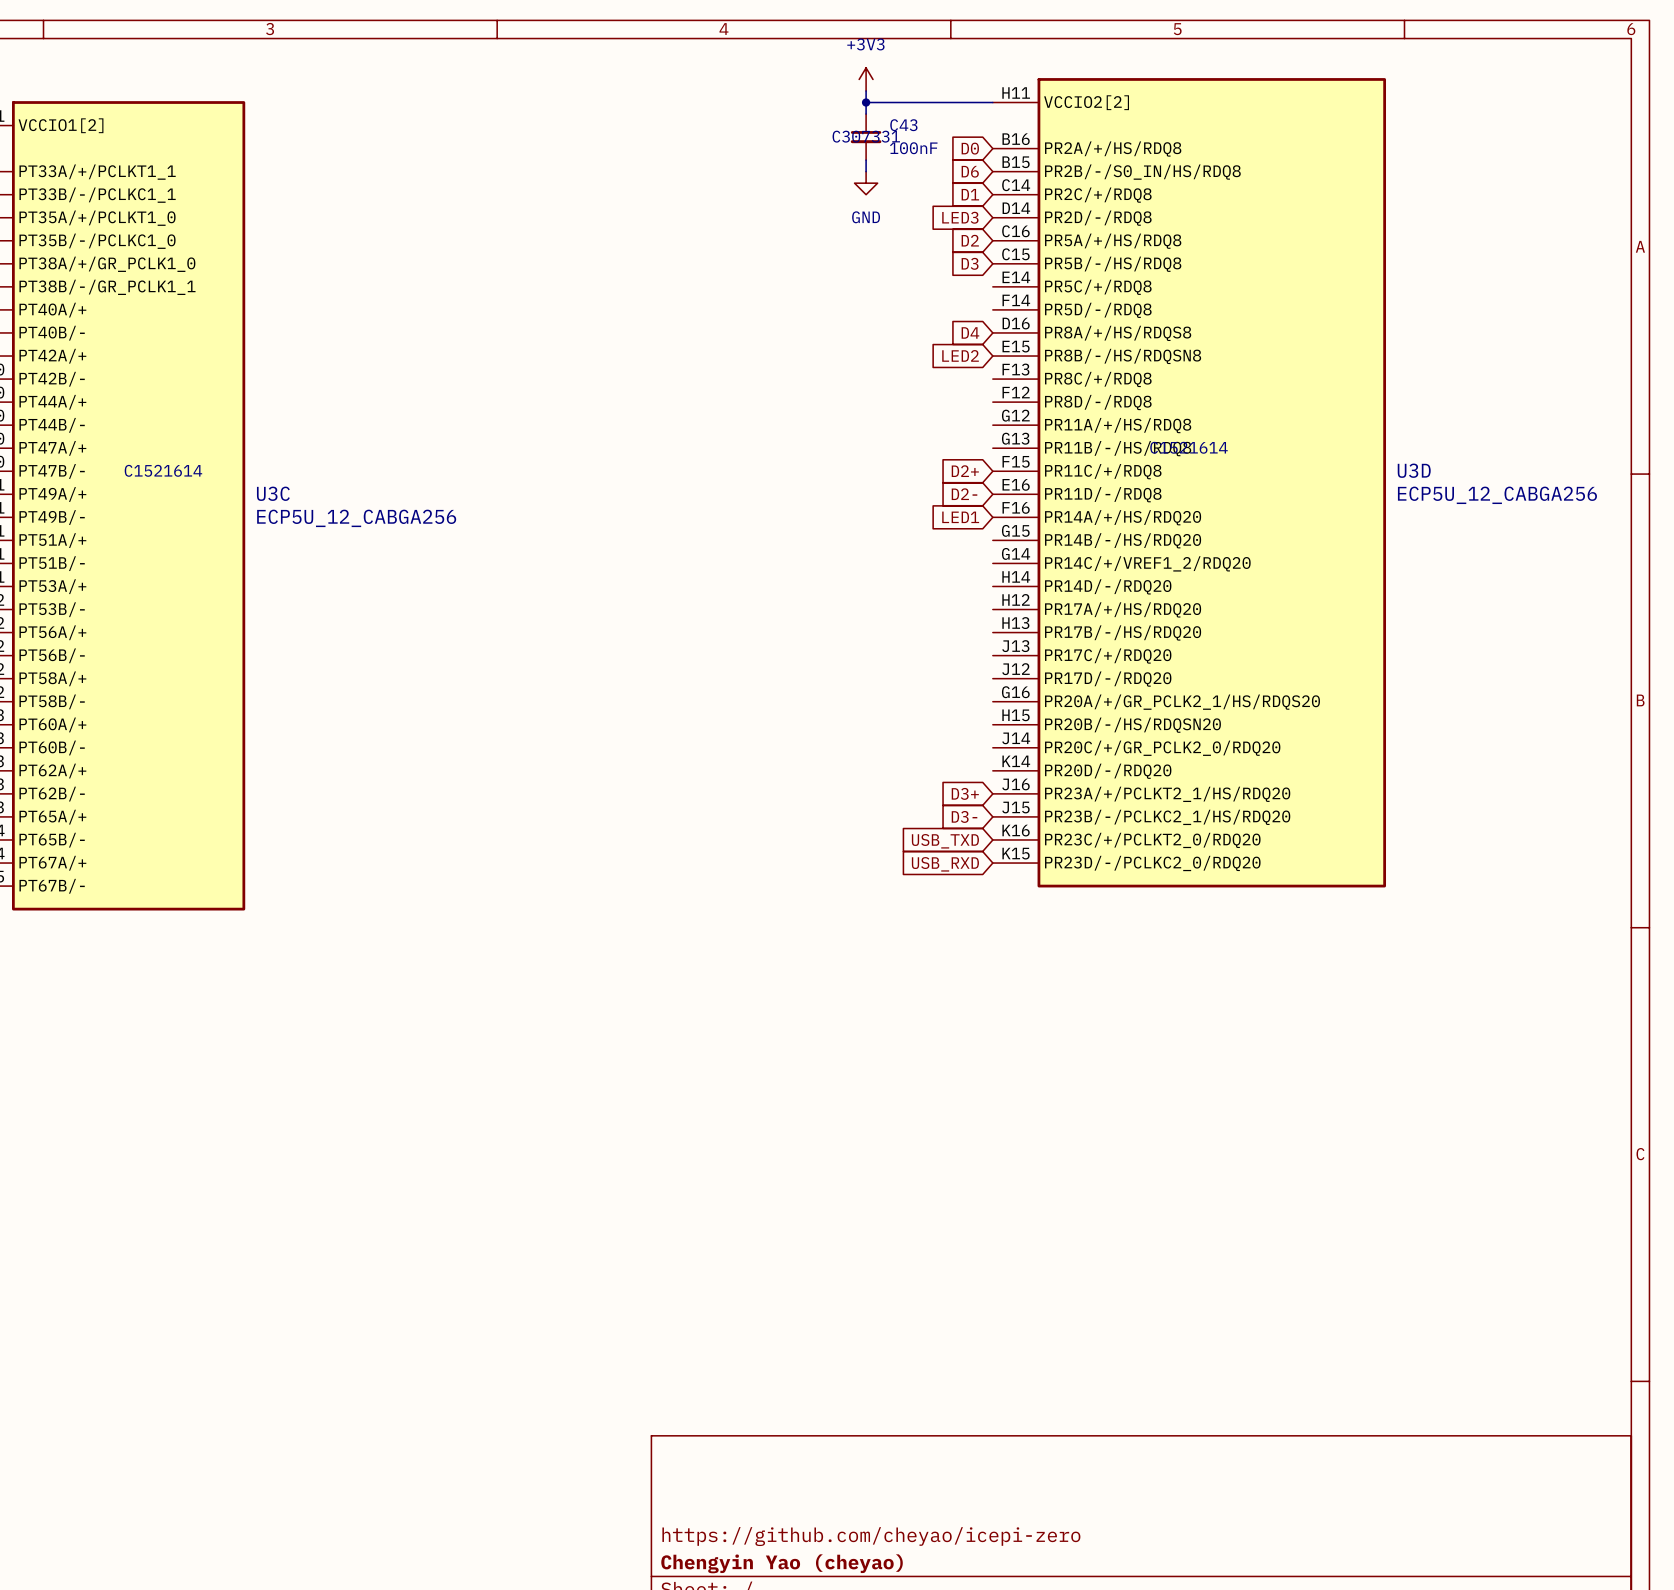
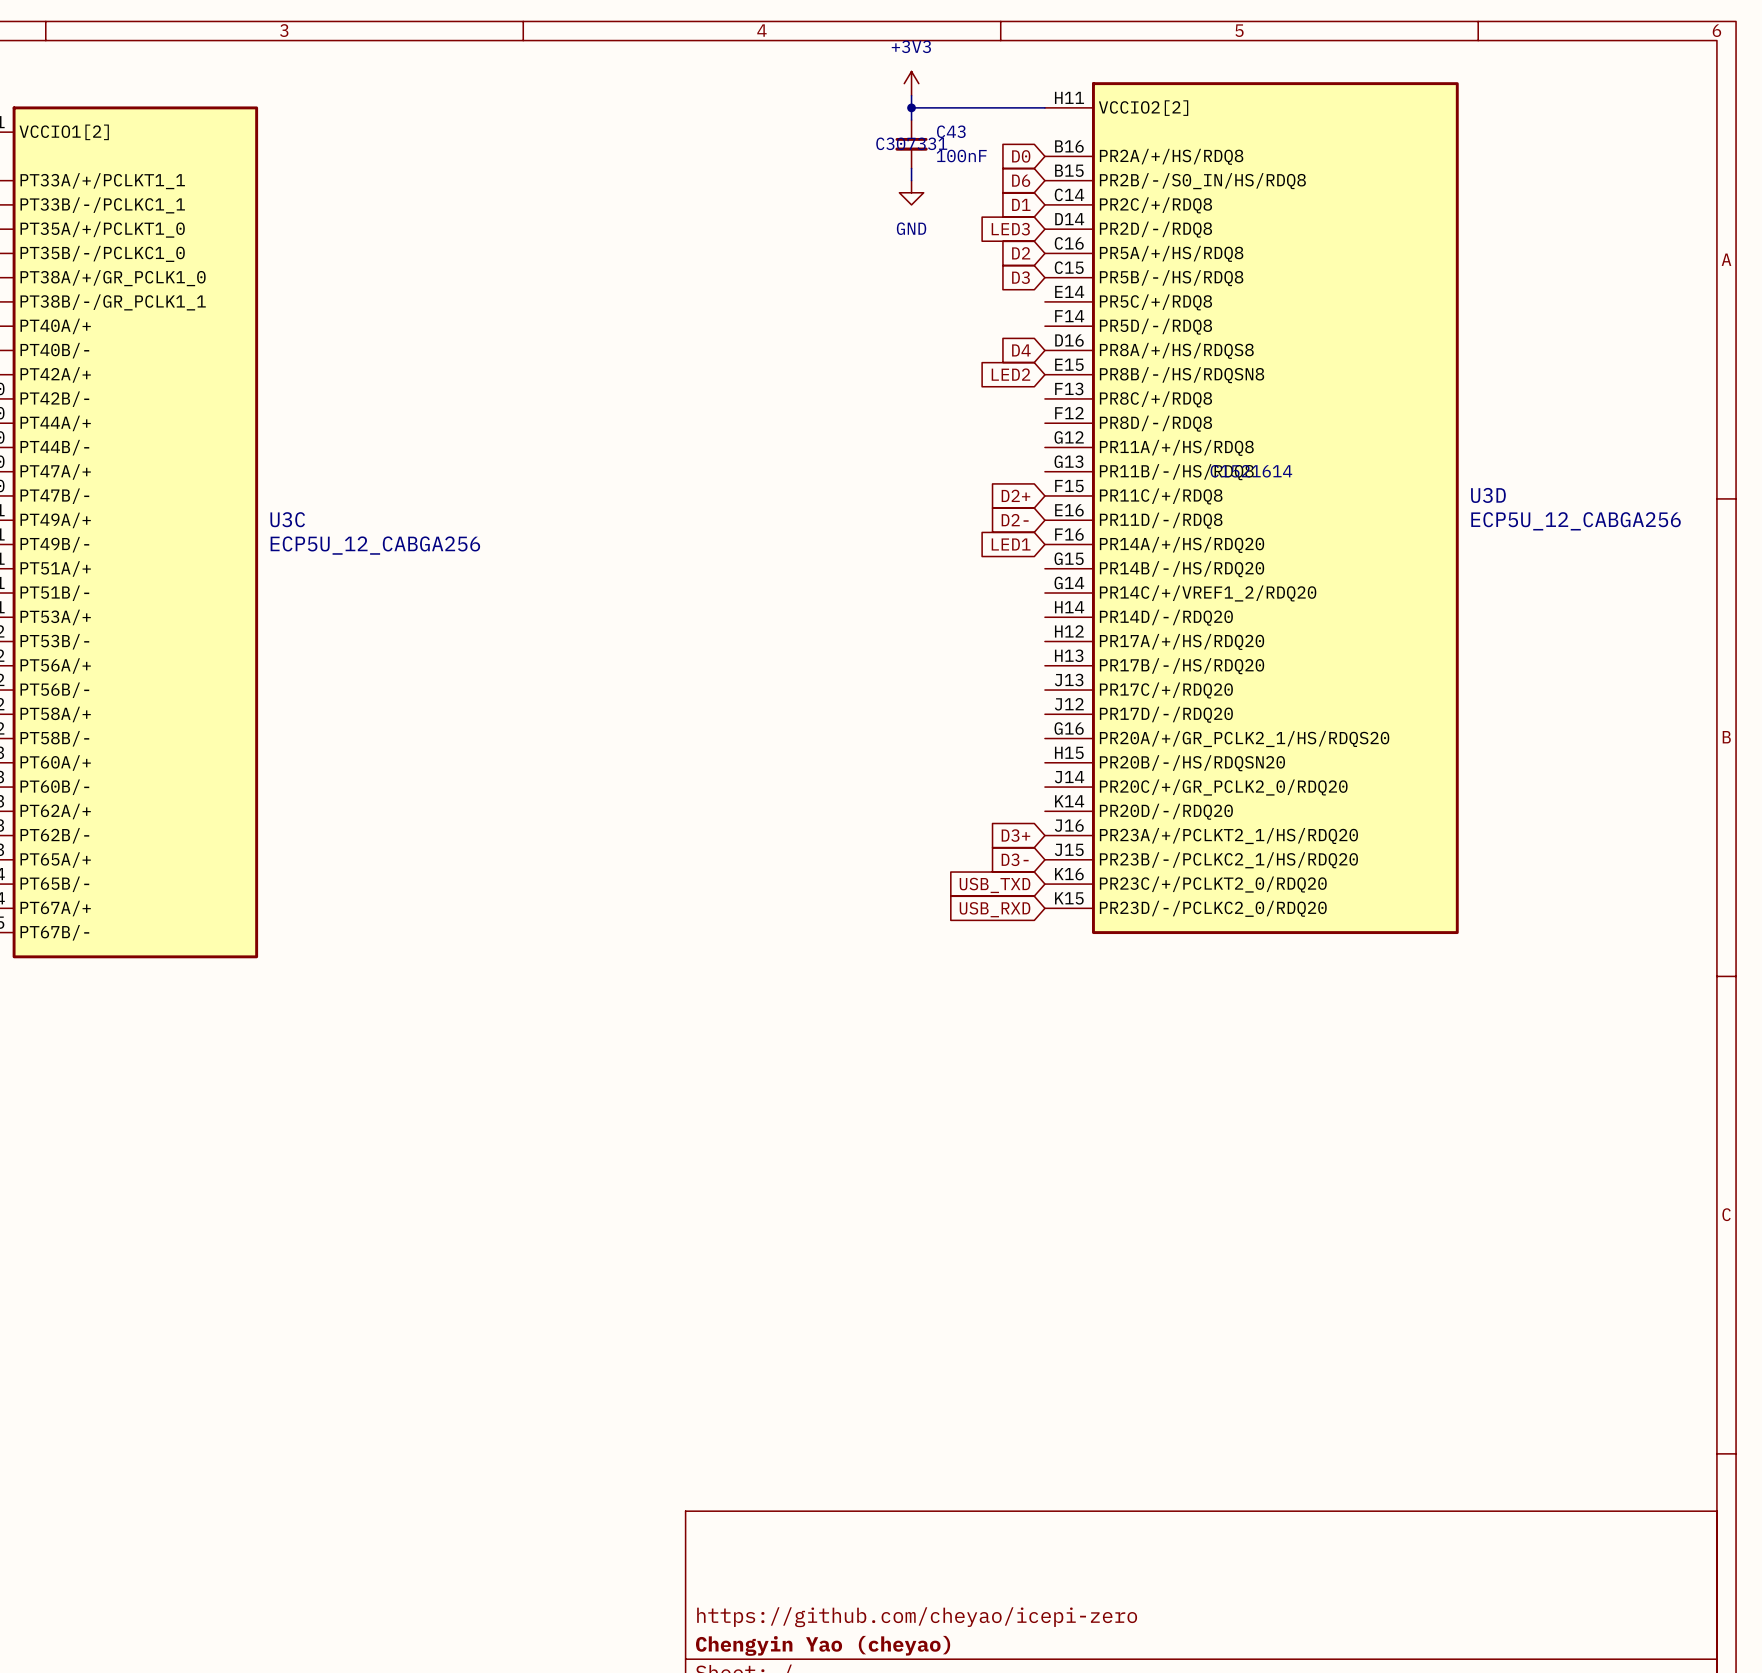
U3C text: C1521614 (163, 470) -> none

